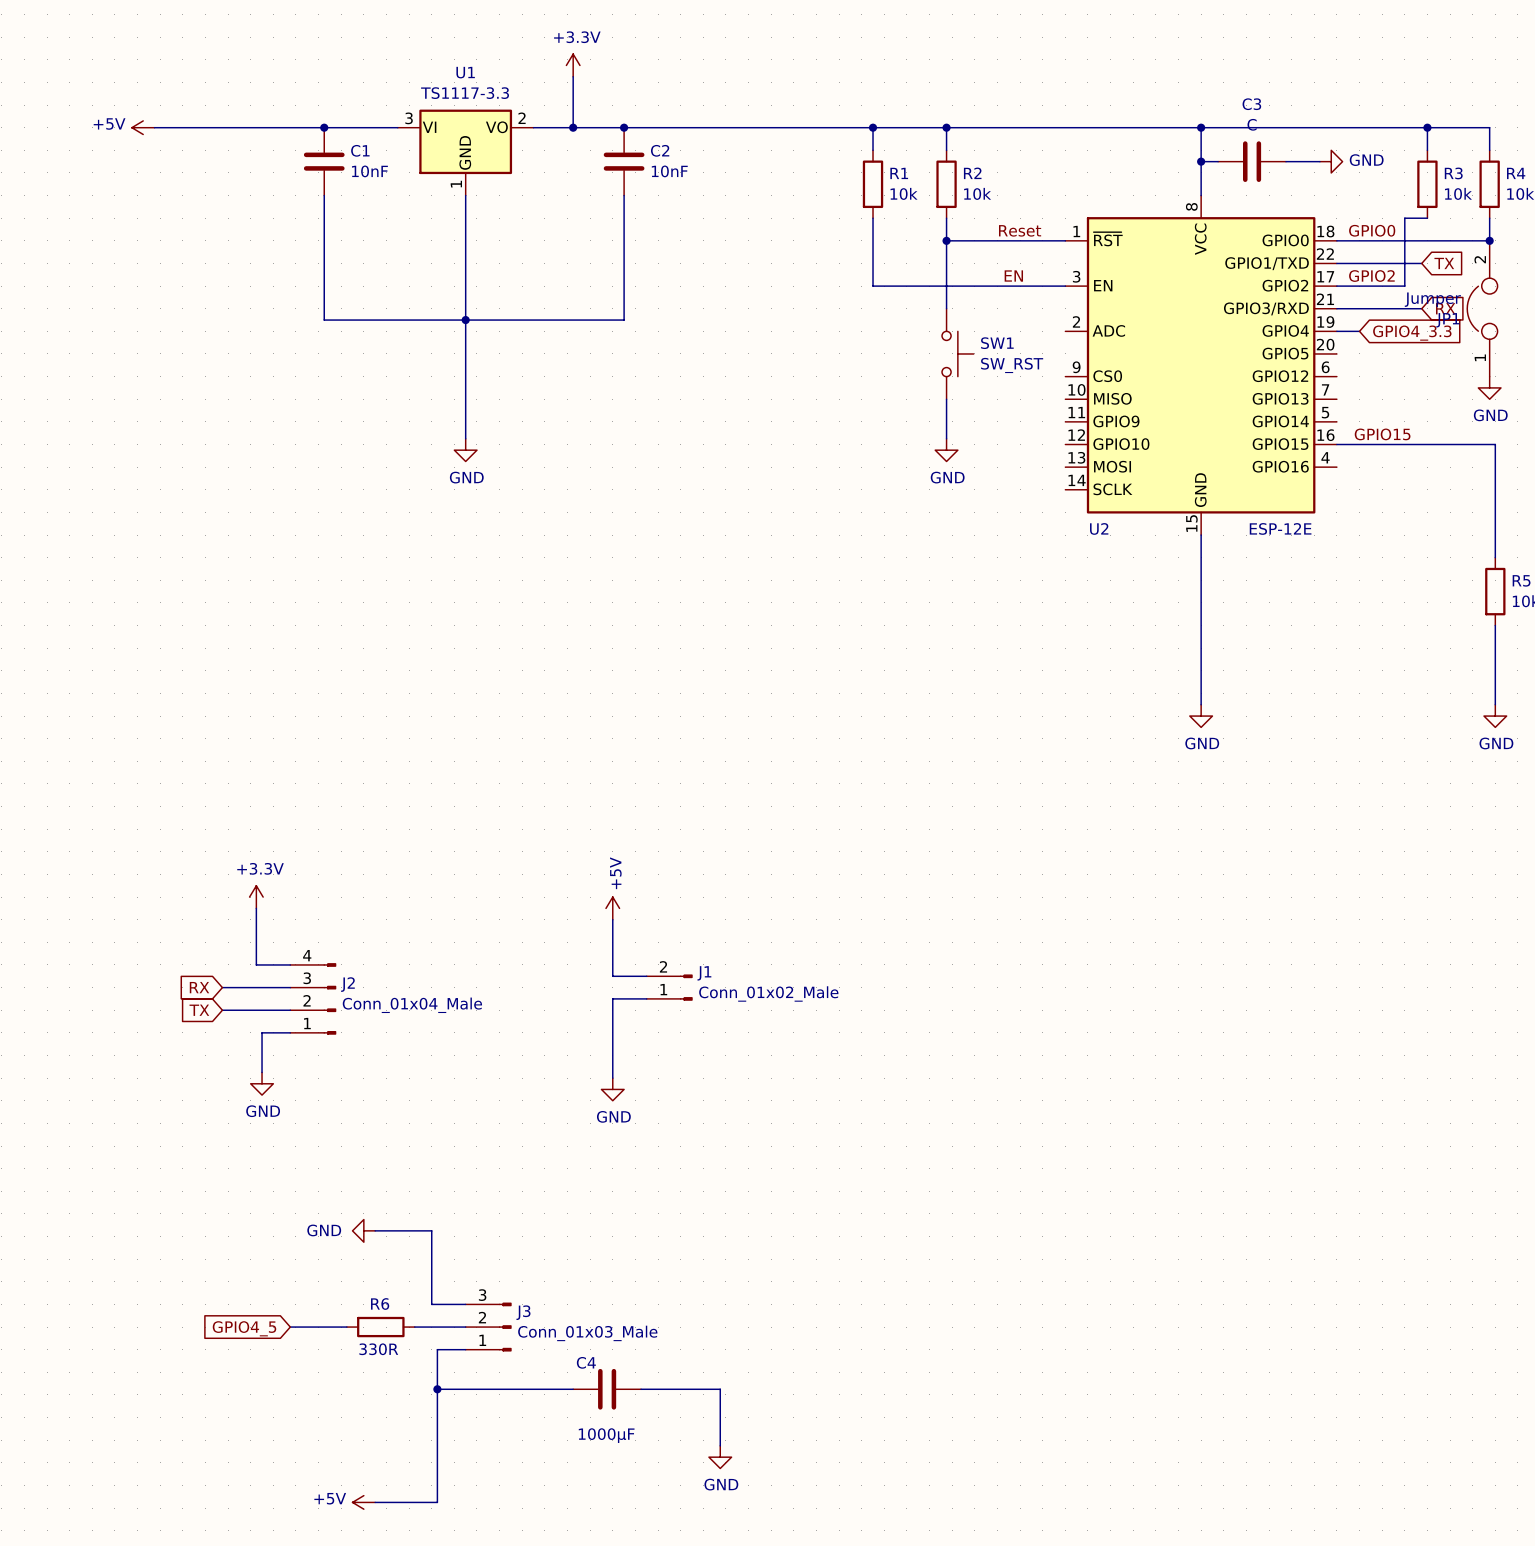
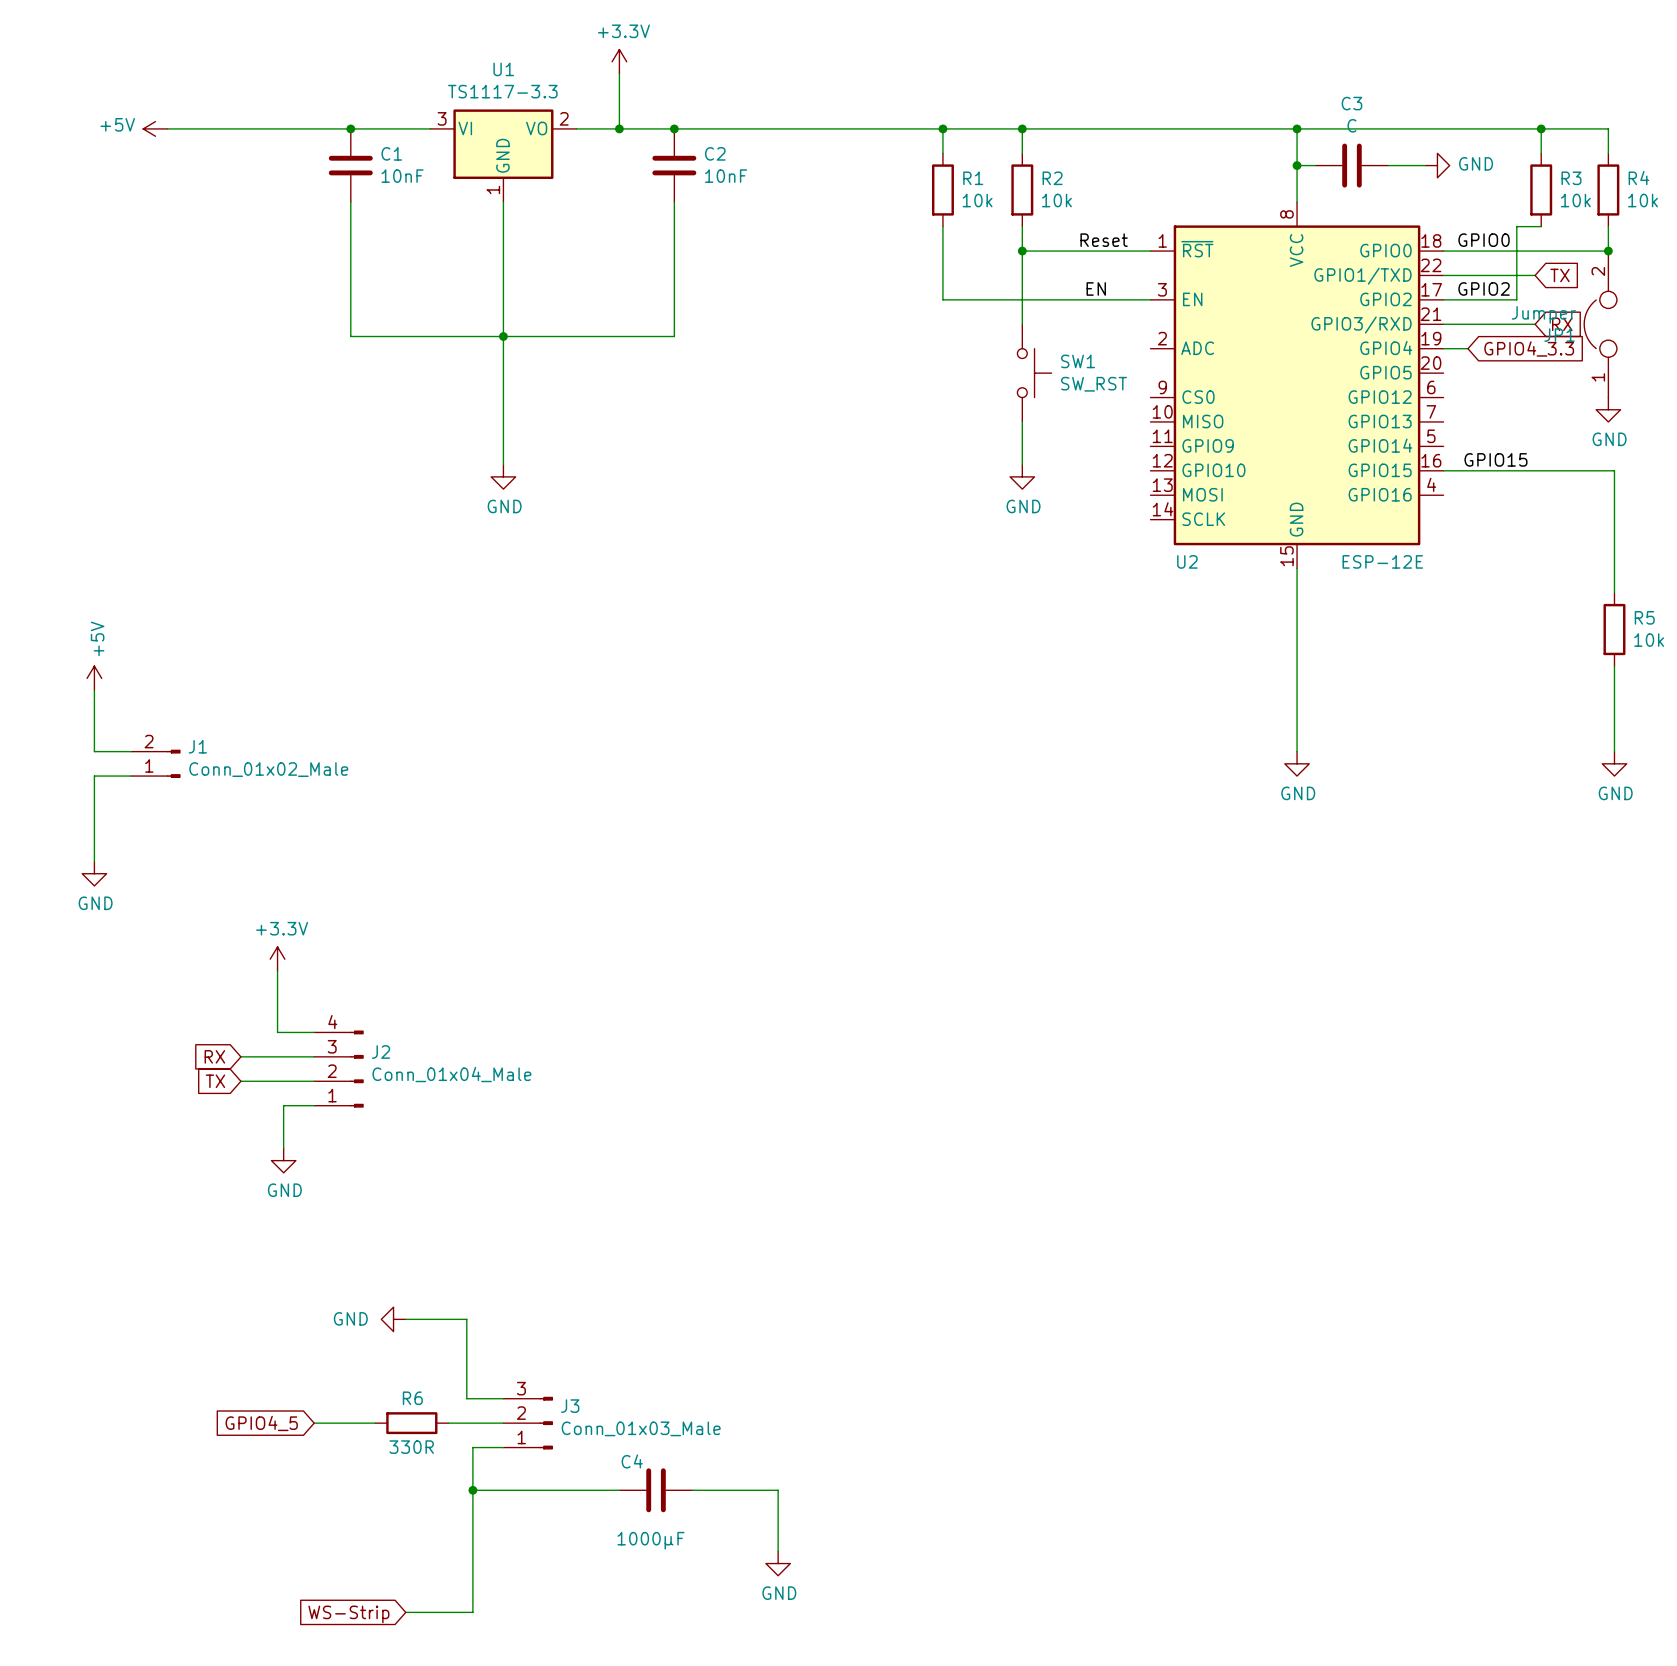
power symbol: none -> +5V (94, 678)
wire: none -> (94, 690) (94, 751) (131, 751)
wire: none -> (131, 776) (94, 776) (94, 861)
power symbol: none -> GND (94, 873)
power symbol: +5V (612, 908) -> none
wire: (612, 919) (612, 976) (646, 976) -> none
J1 position: (669, 987) -> (155, 763)
wire: (646, 998) (612, 998) (612, 1078) -> none
power symbol: GND (612, 1089) -> none
power symbol: +5V (363, 1502) -> none
global label: none -> WS-Strip (348, 1614)

